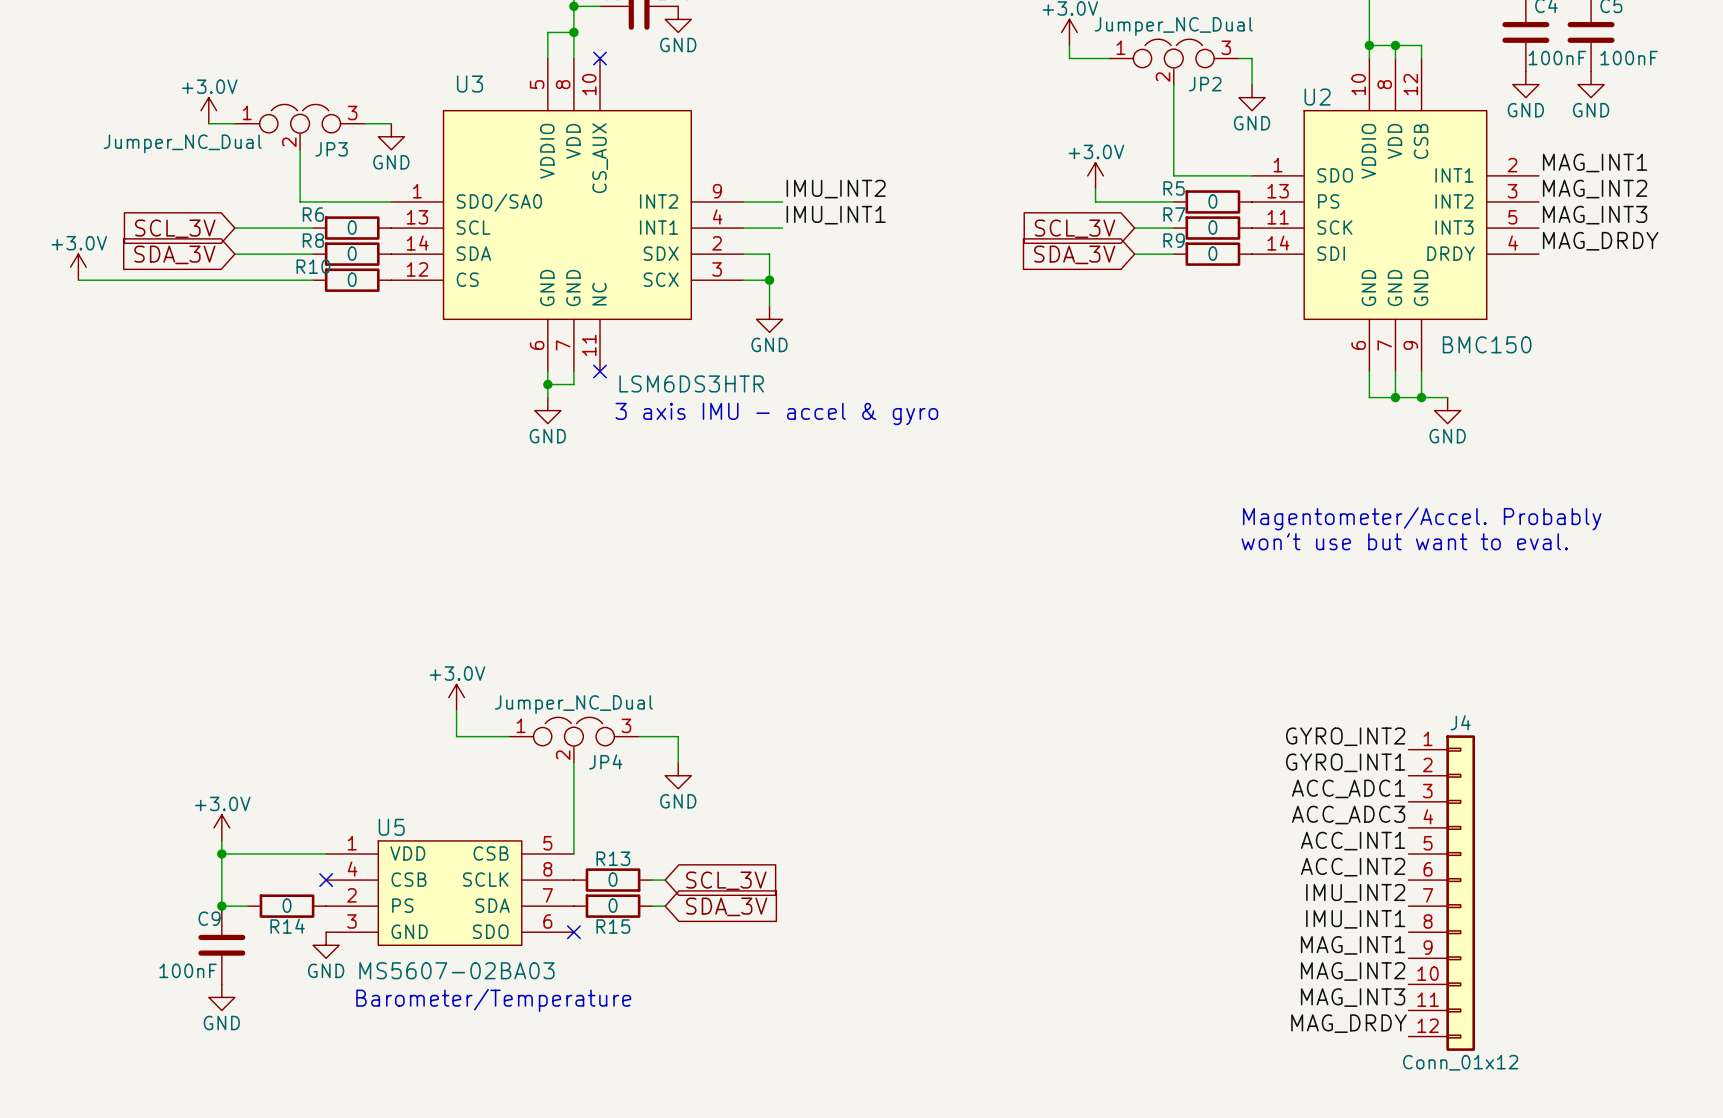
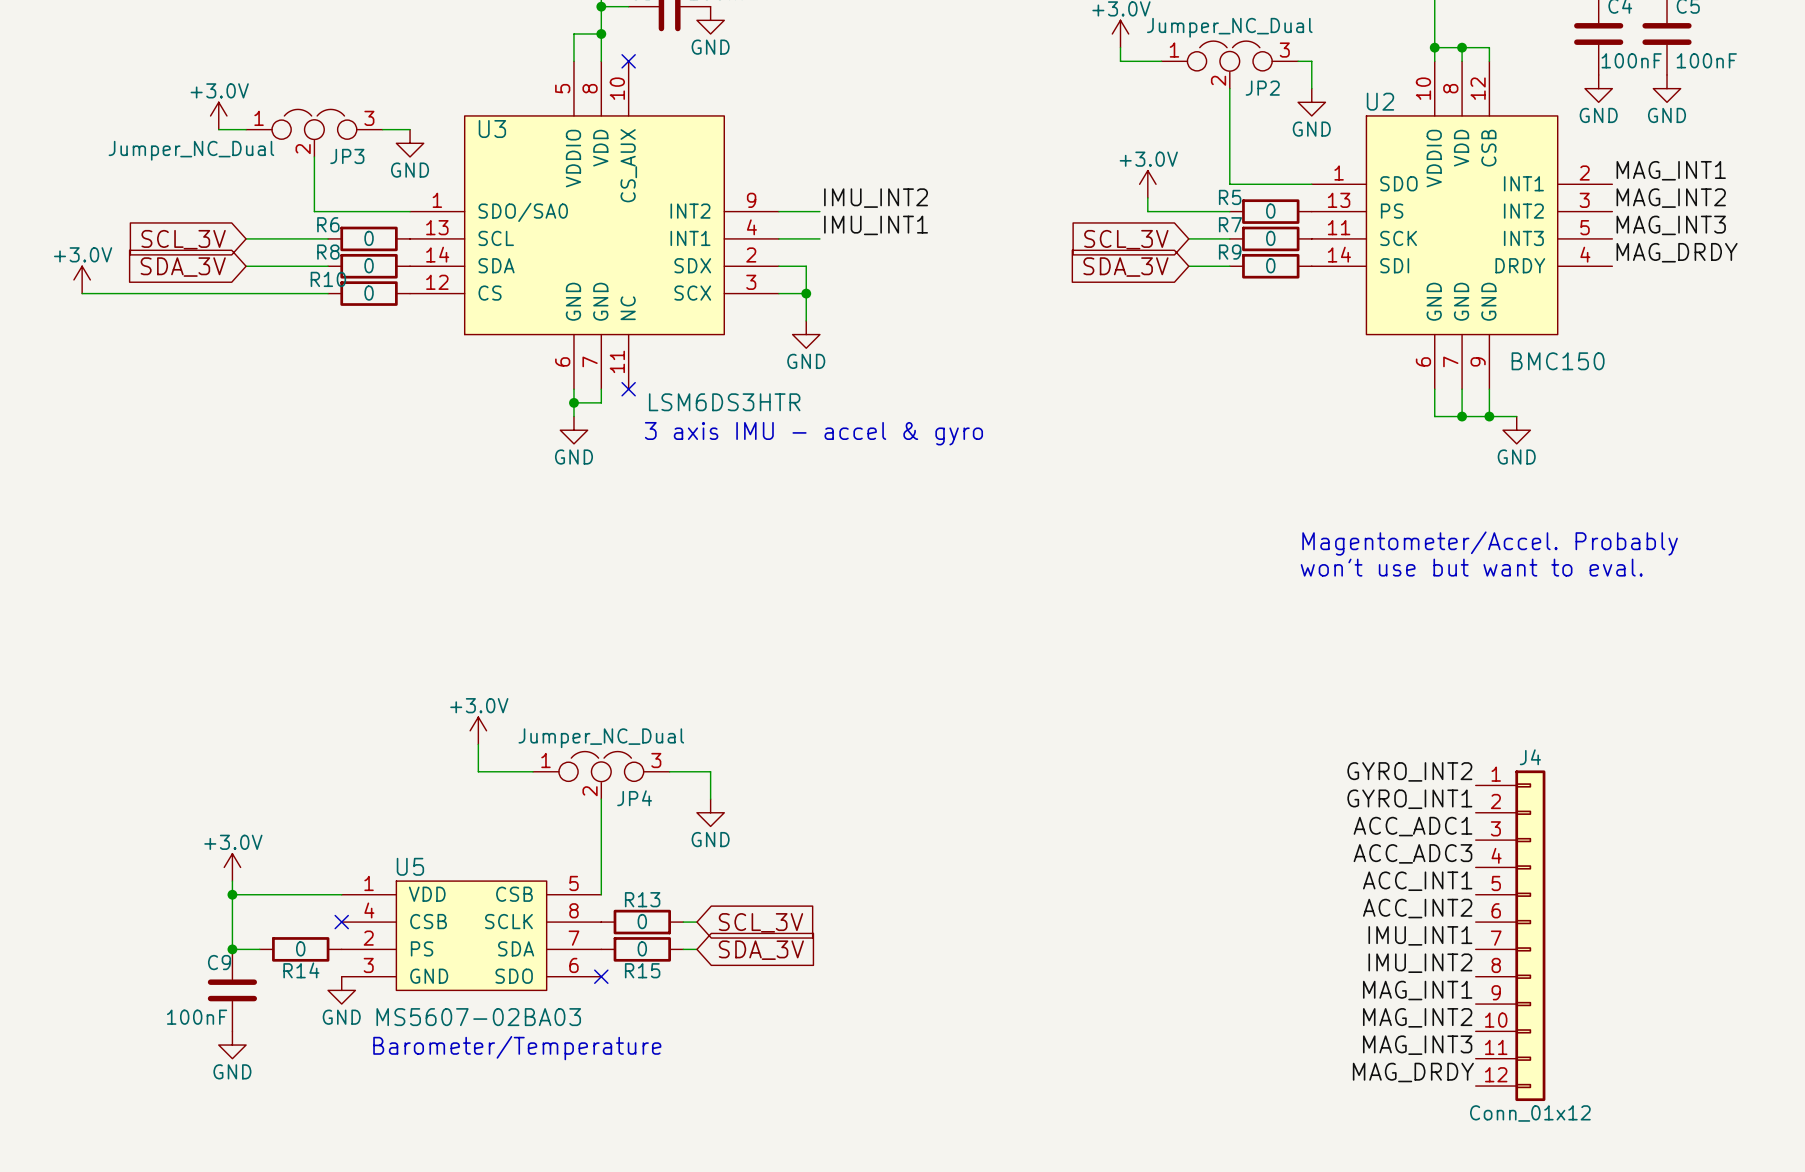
U3 name position: U3 (469, 84) -> U3 (492, 129)
label: IMU_INT2 (1355, 893) -> IMU_INT1 (1420, 935)
label: IMU_INT1 (1355, 919) -> IMU_INT2 (1420, 963)

